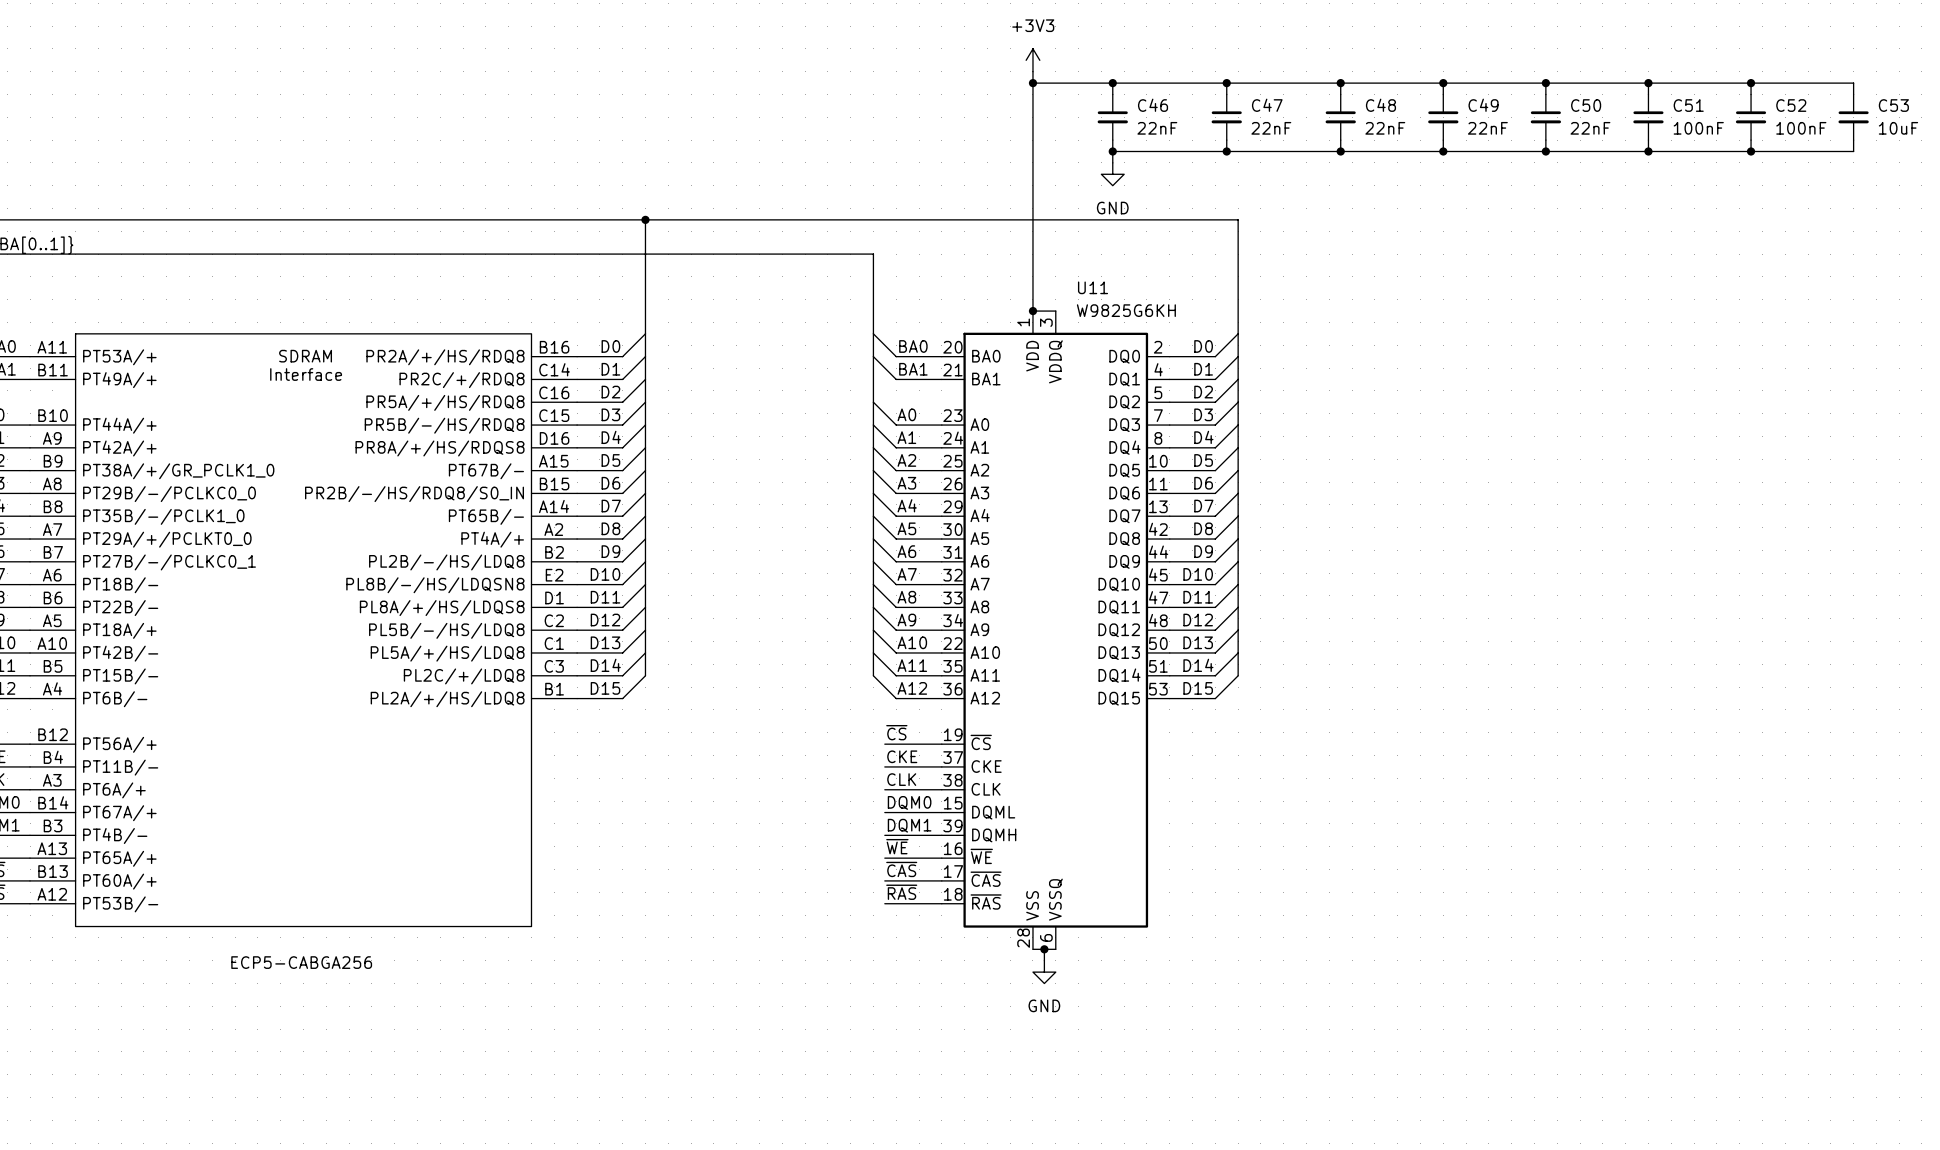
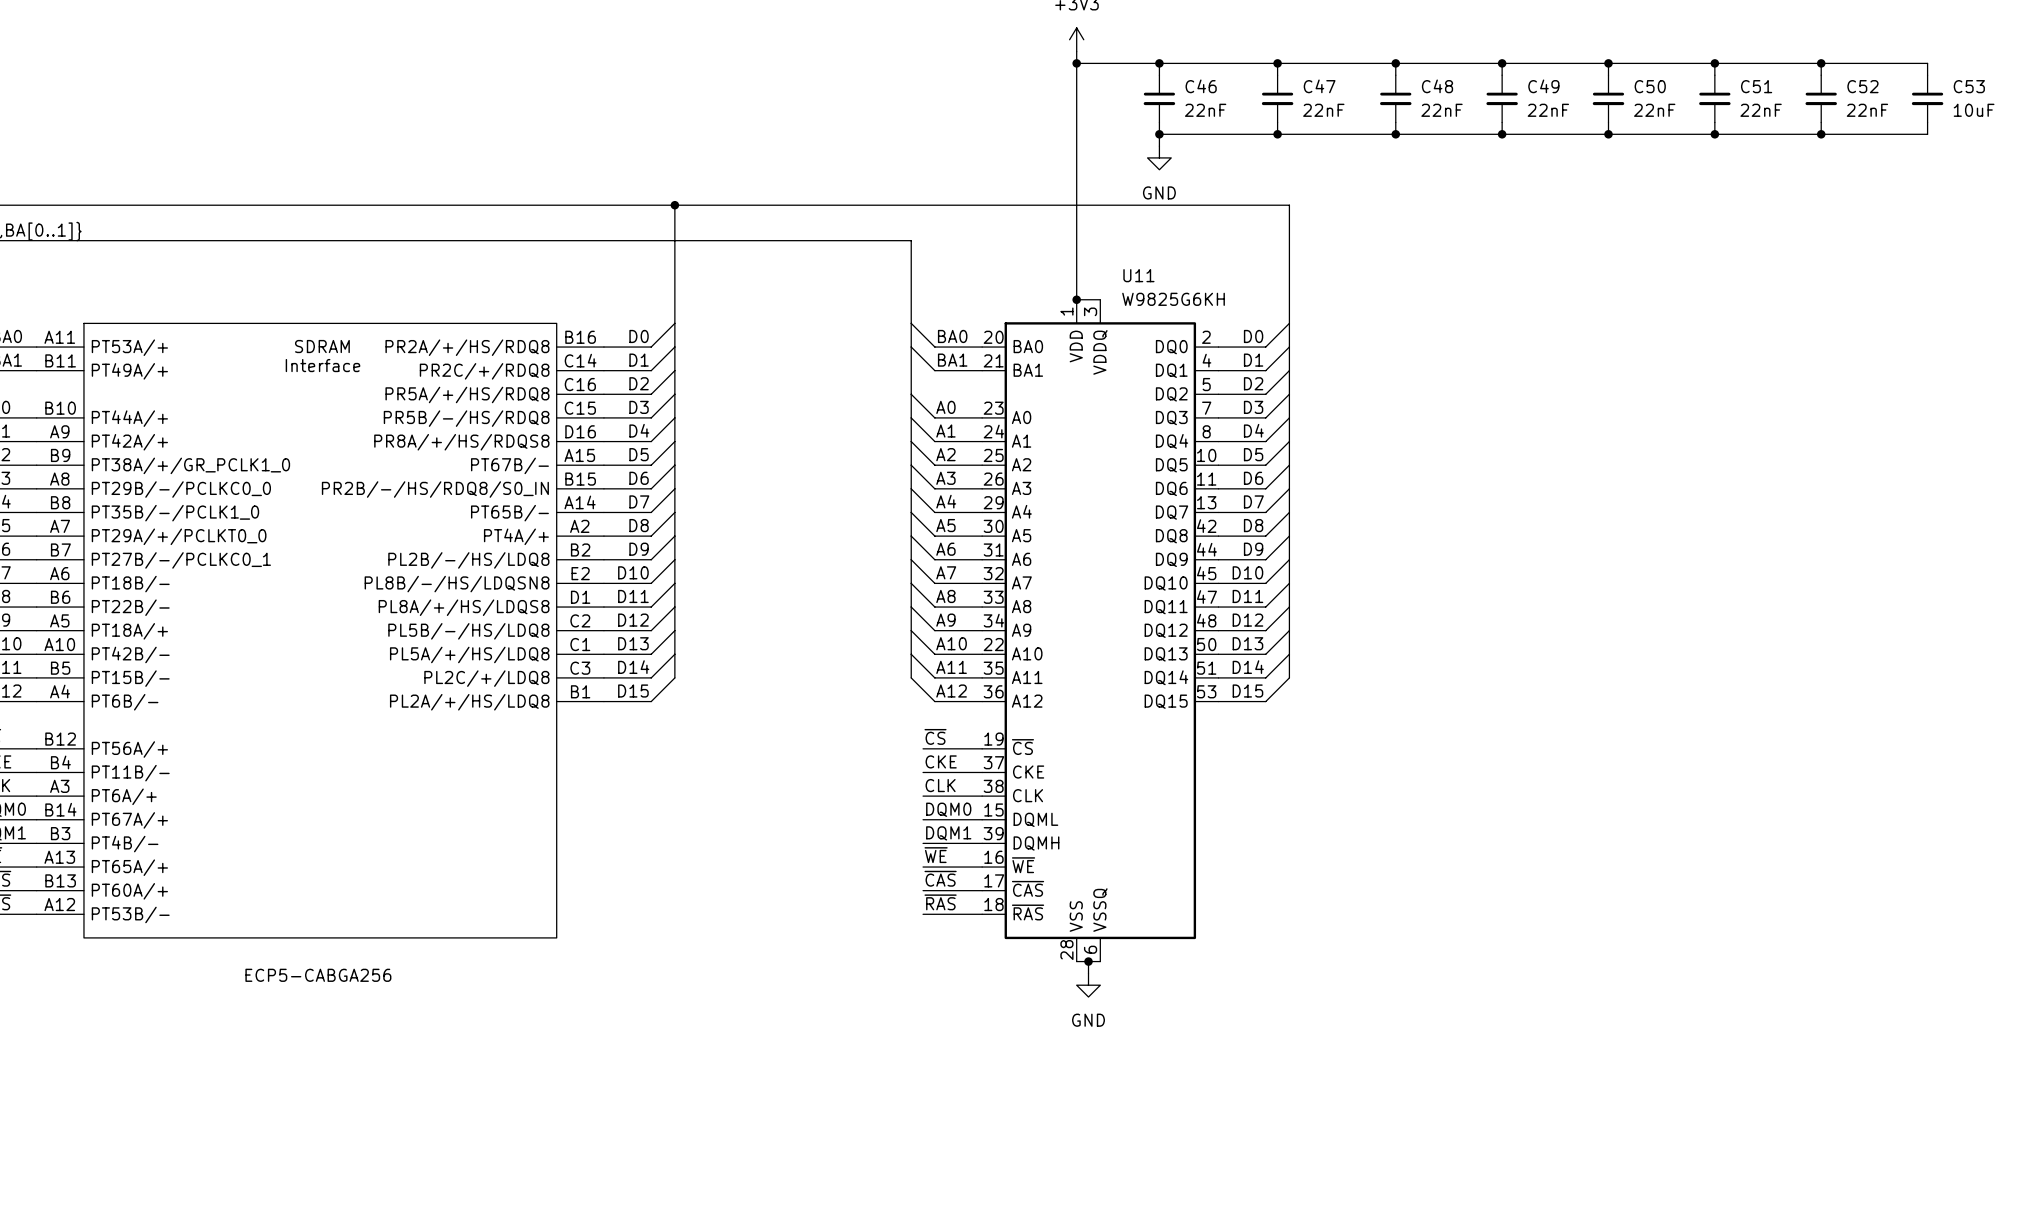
C51 value: 100nF (1698, 128) -> 22nF (1761, 110)
C52 value: 100nF (1801, 128) -> 22nF (1867, 110)

